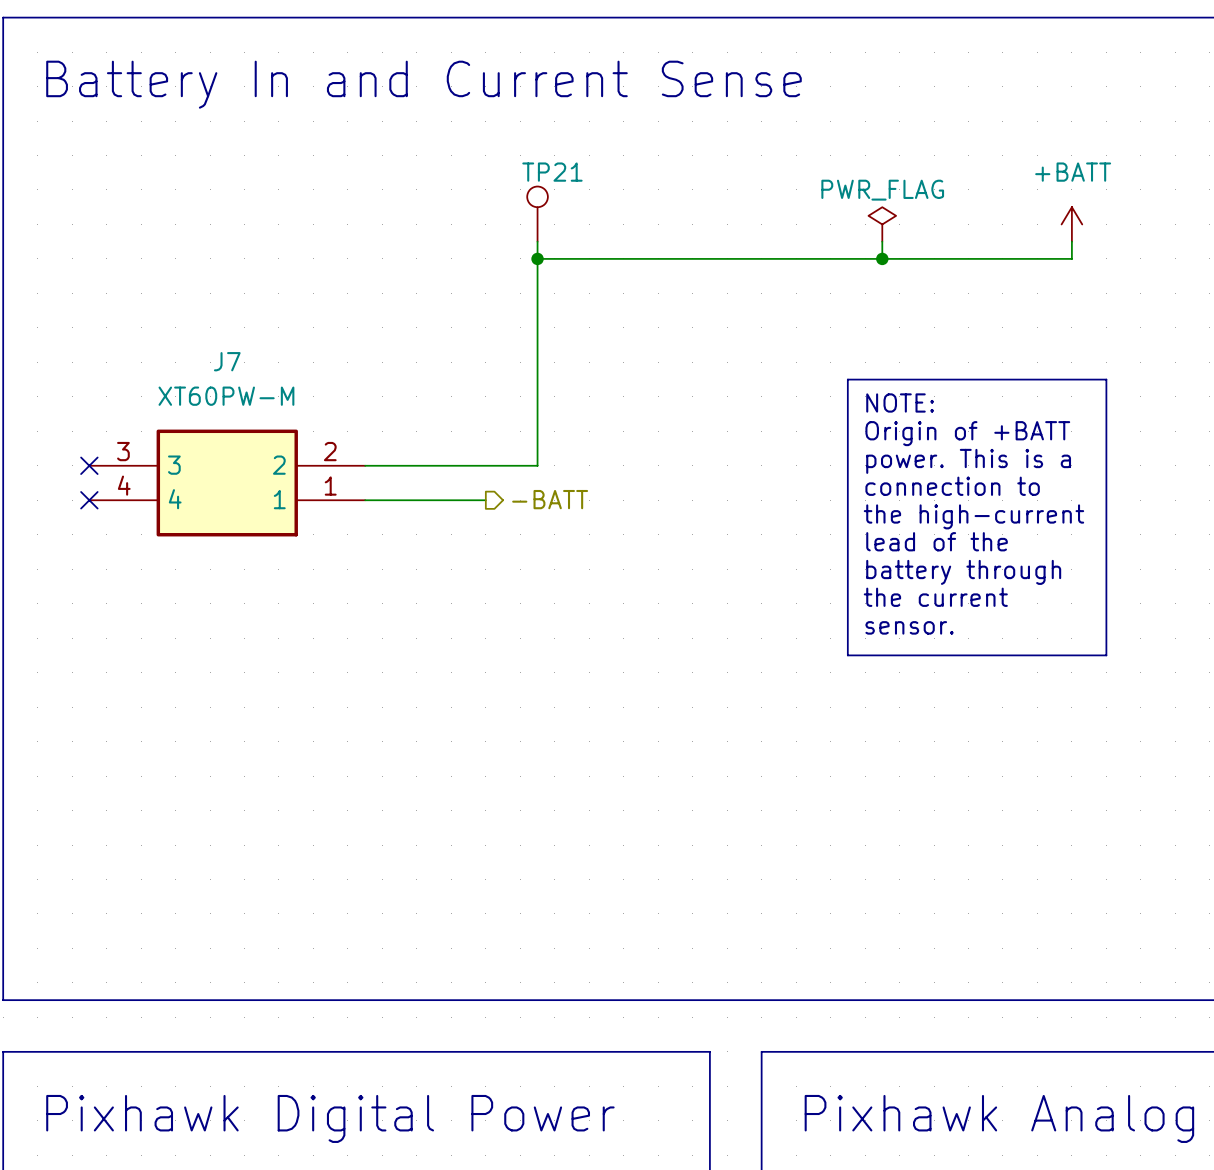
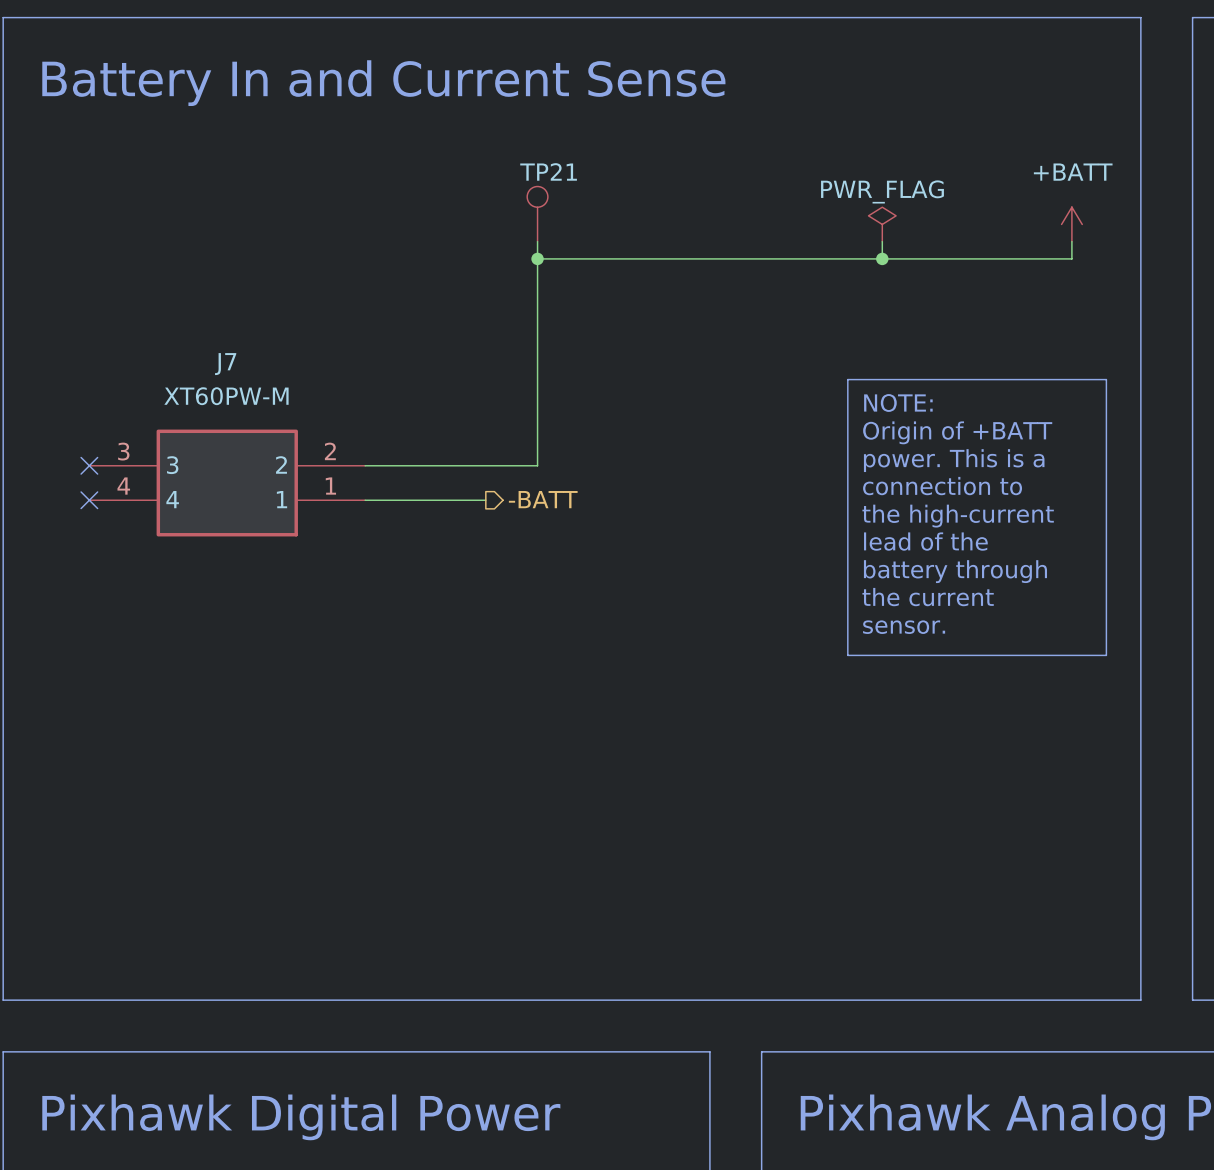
line: (1140, 17) (1192, 17) -> (1140, 17) (1140, 1000)
line: (1140, 1000) (1192, 1000) -> (1192, 17) (1192, 1000)

